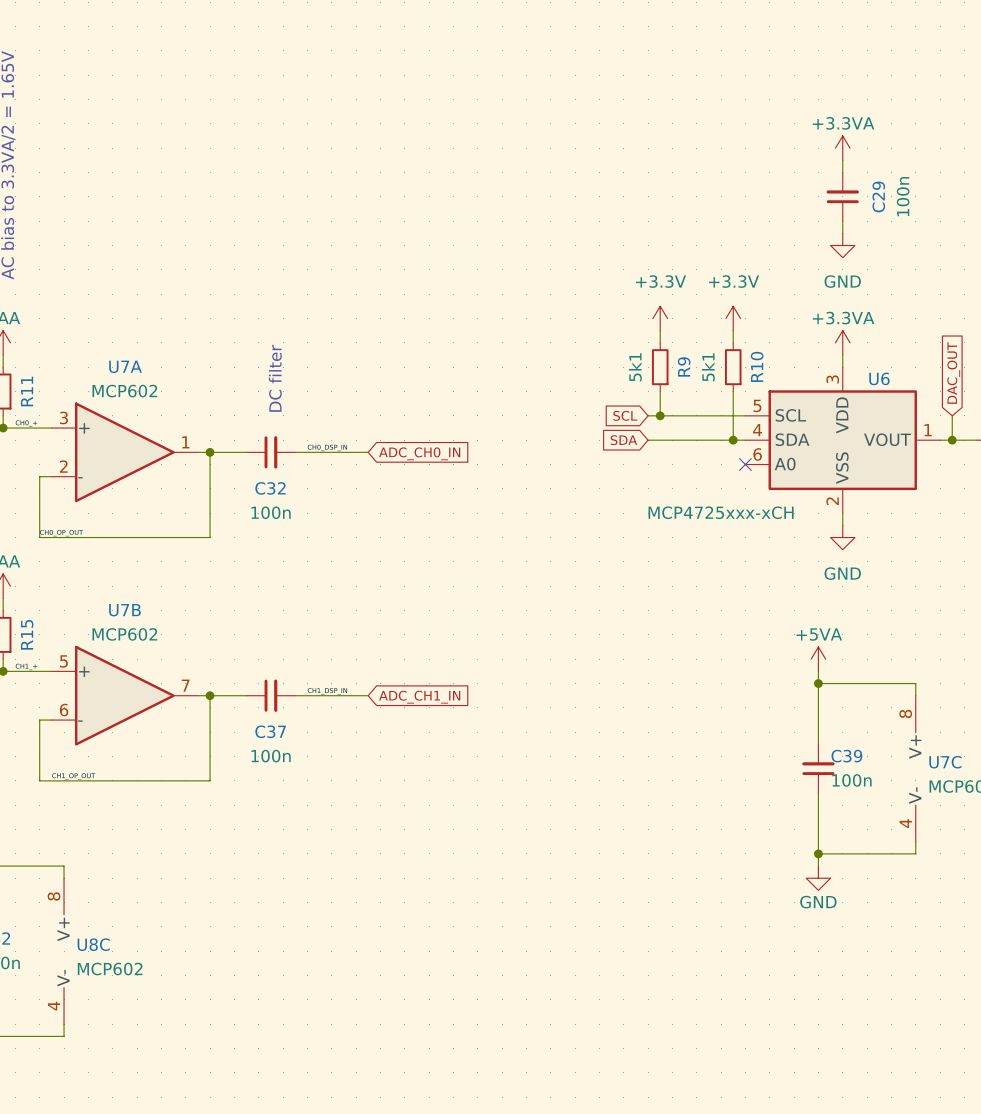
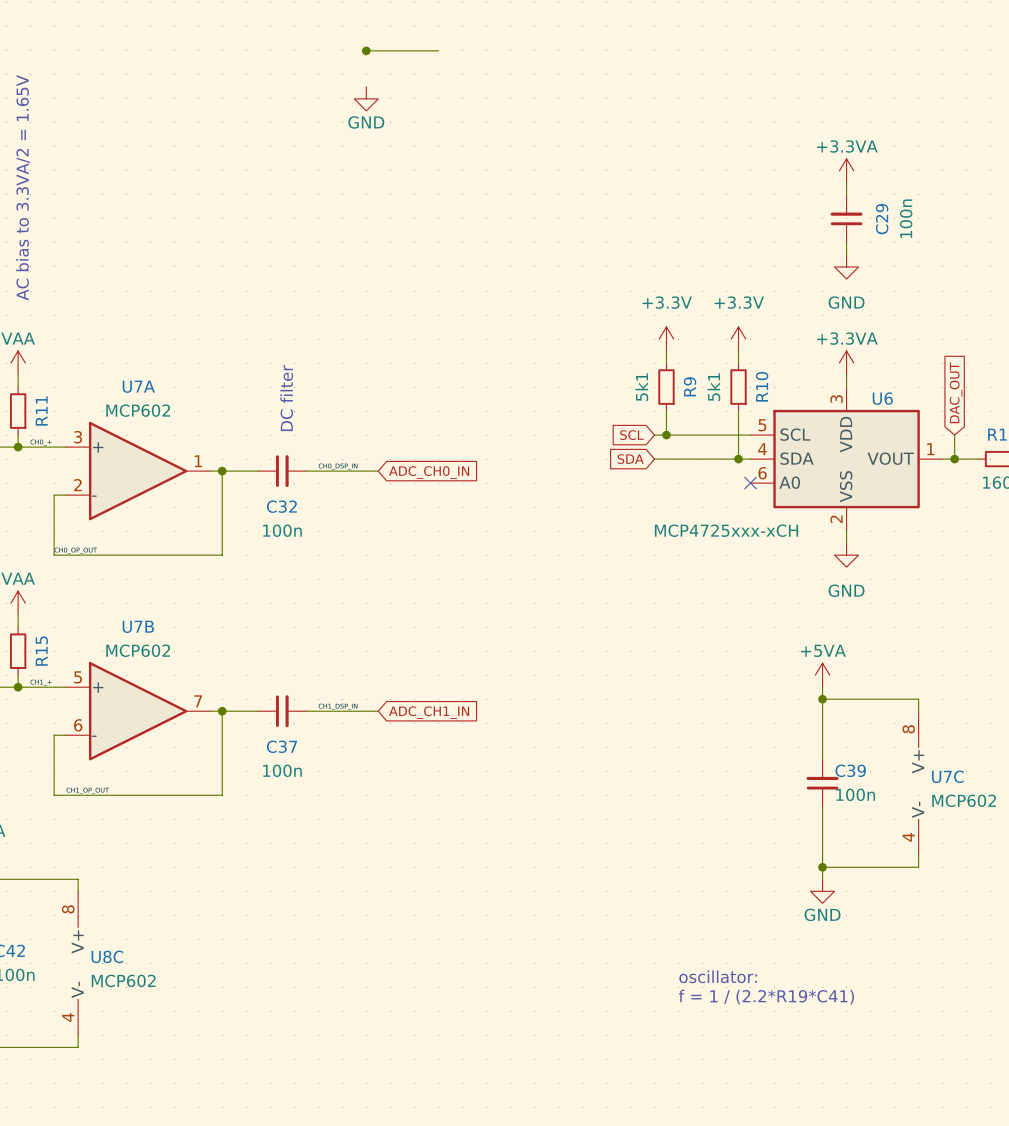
wire: none -> (366, 50) (438, 50)
junction: none -> (366, 50)
power symbol: none -> GND (366, 98)
text: none -> oscillator: (718, 976)
text: none -> f = 1 / (2.2*R19*C41) (766, 997)

